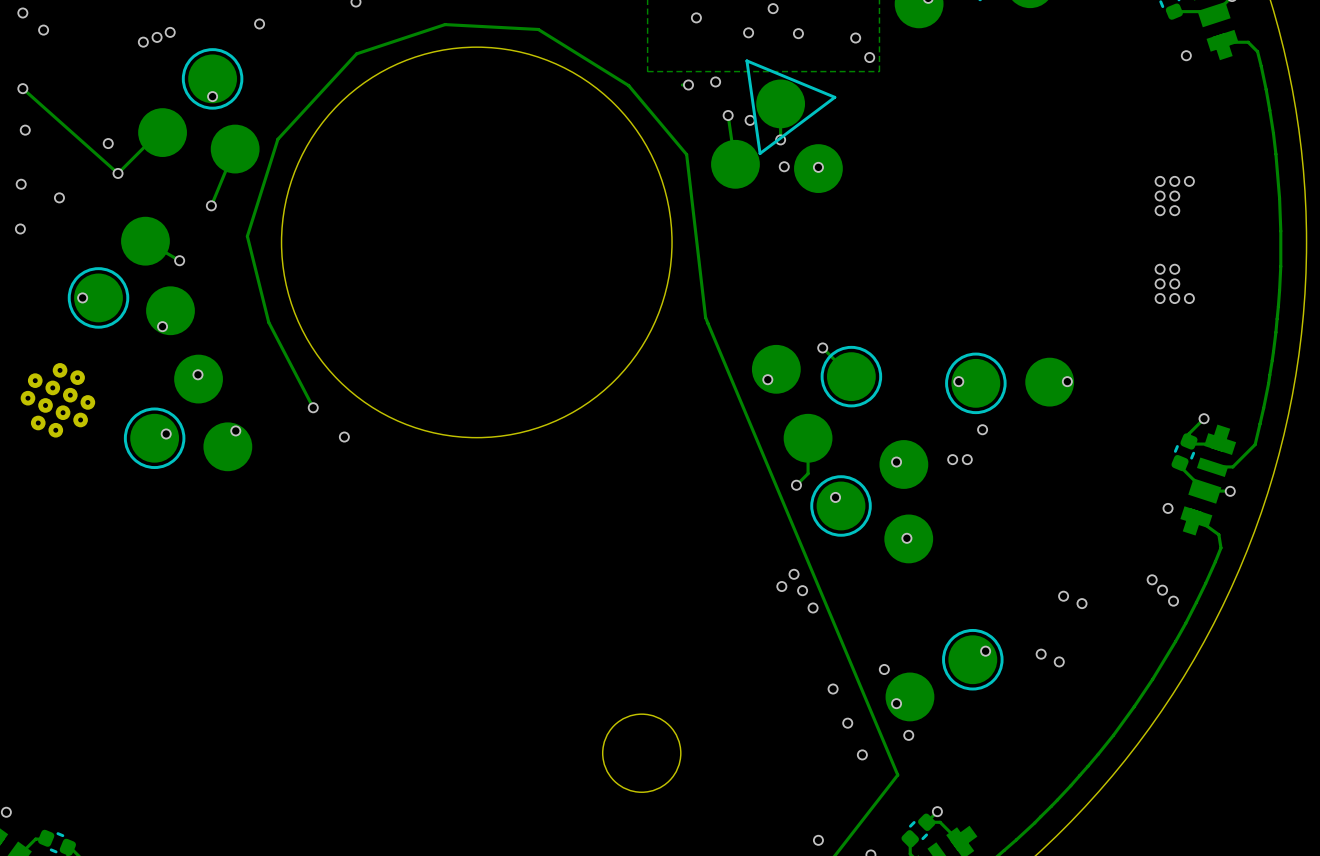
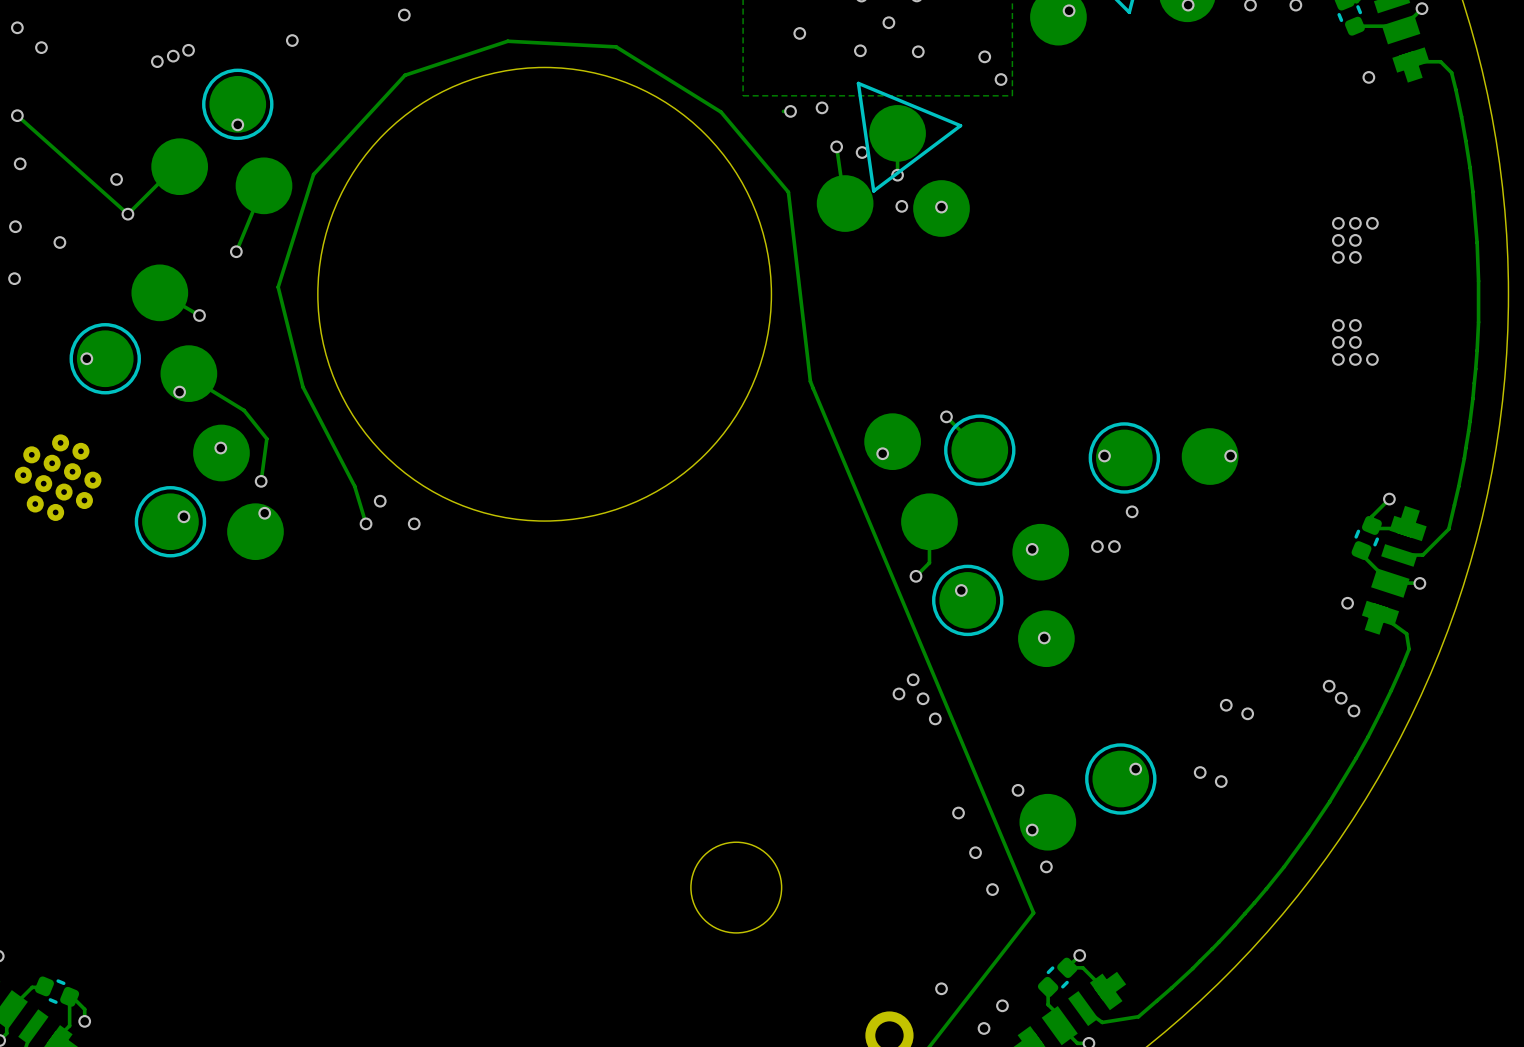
track: none -> (193, 379) (244, 410) (266, 438) (261, 481)
via: none -> (261, 481)
track: none -> (354, 486) (366, 523)
via: (313, 407) -> none
via: none -> (380, 501)
via: (344, 437) -> none
via: none -> (366, 523)
via: none -> (414, 523)

